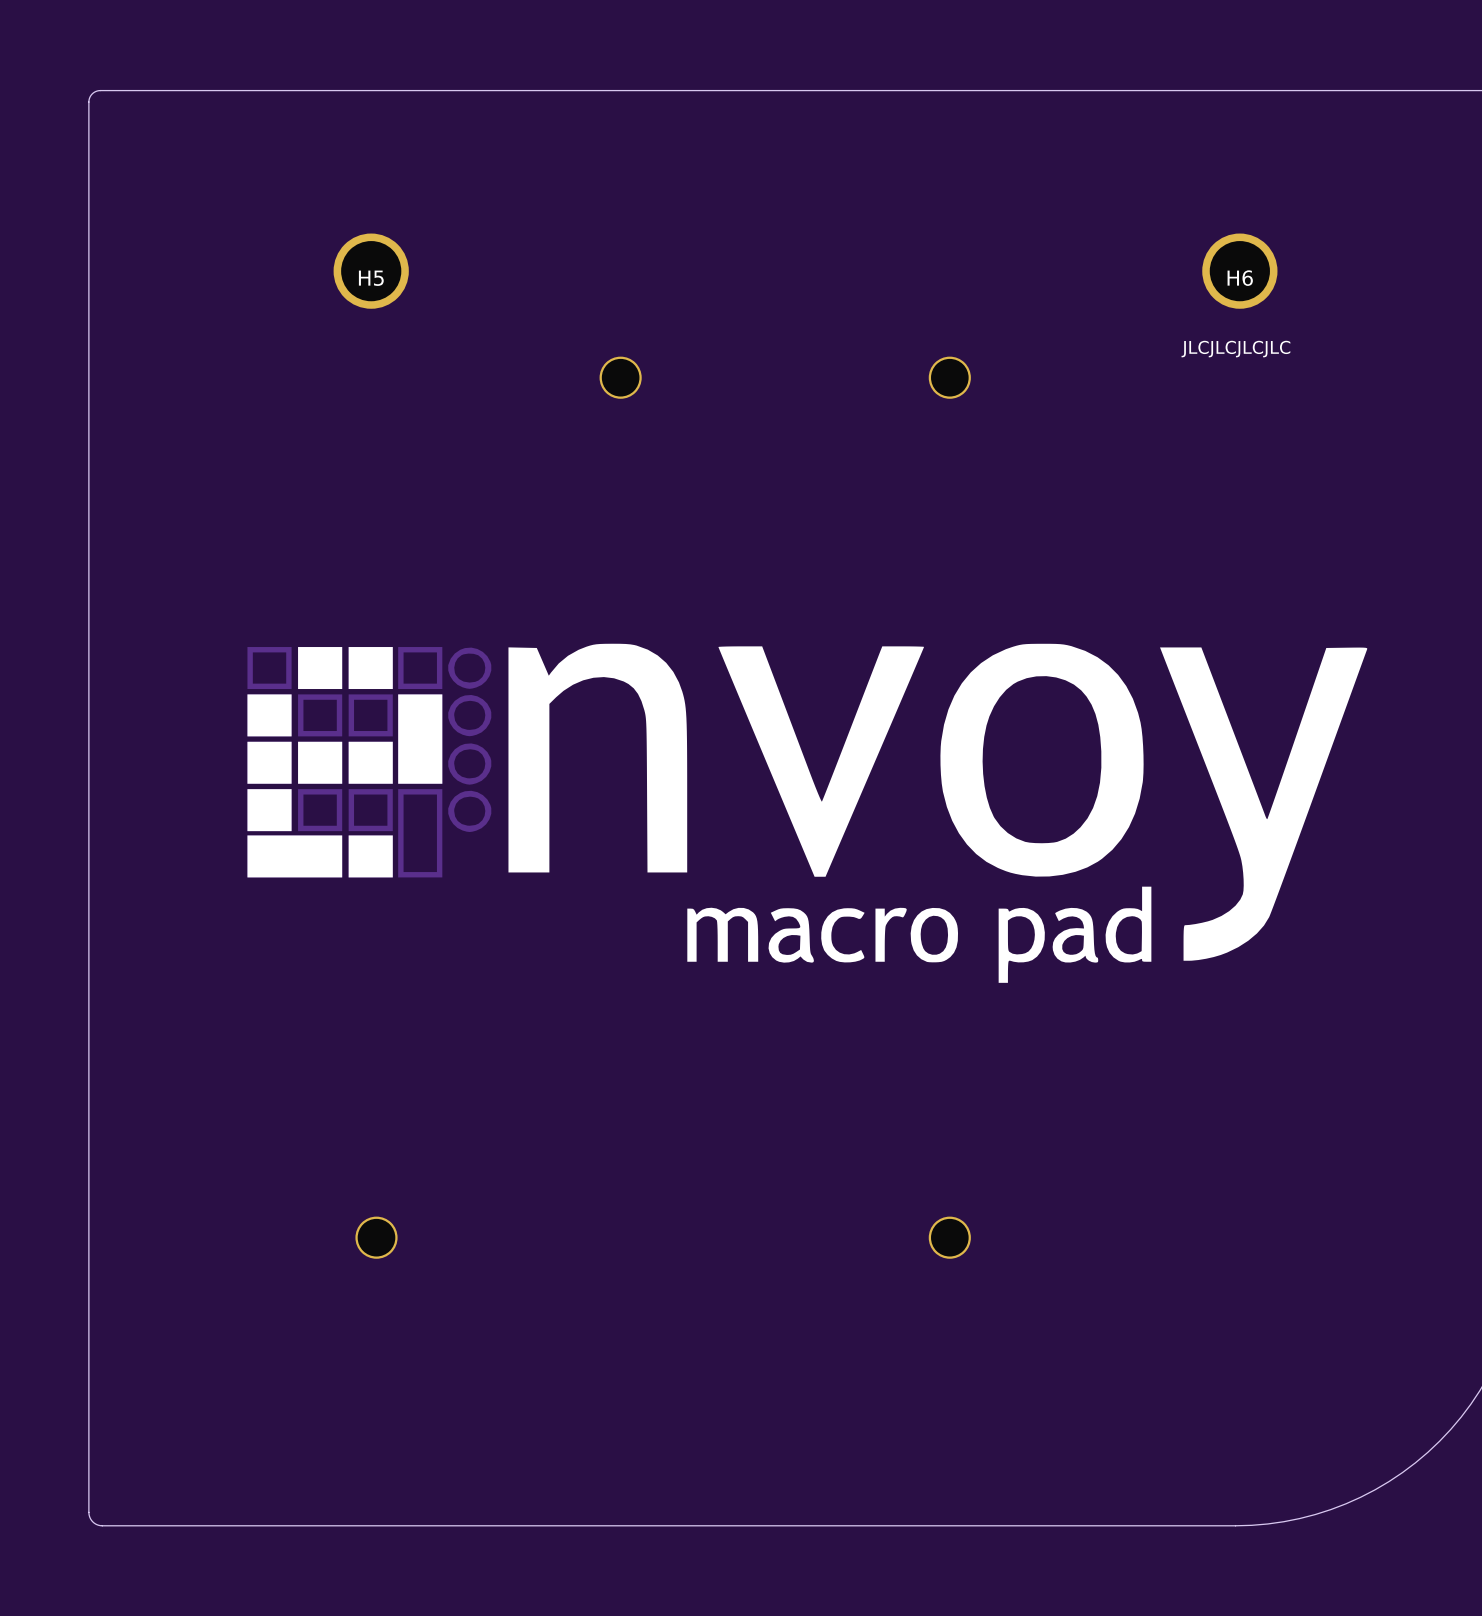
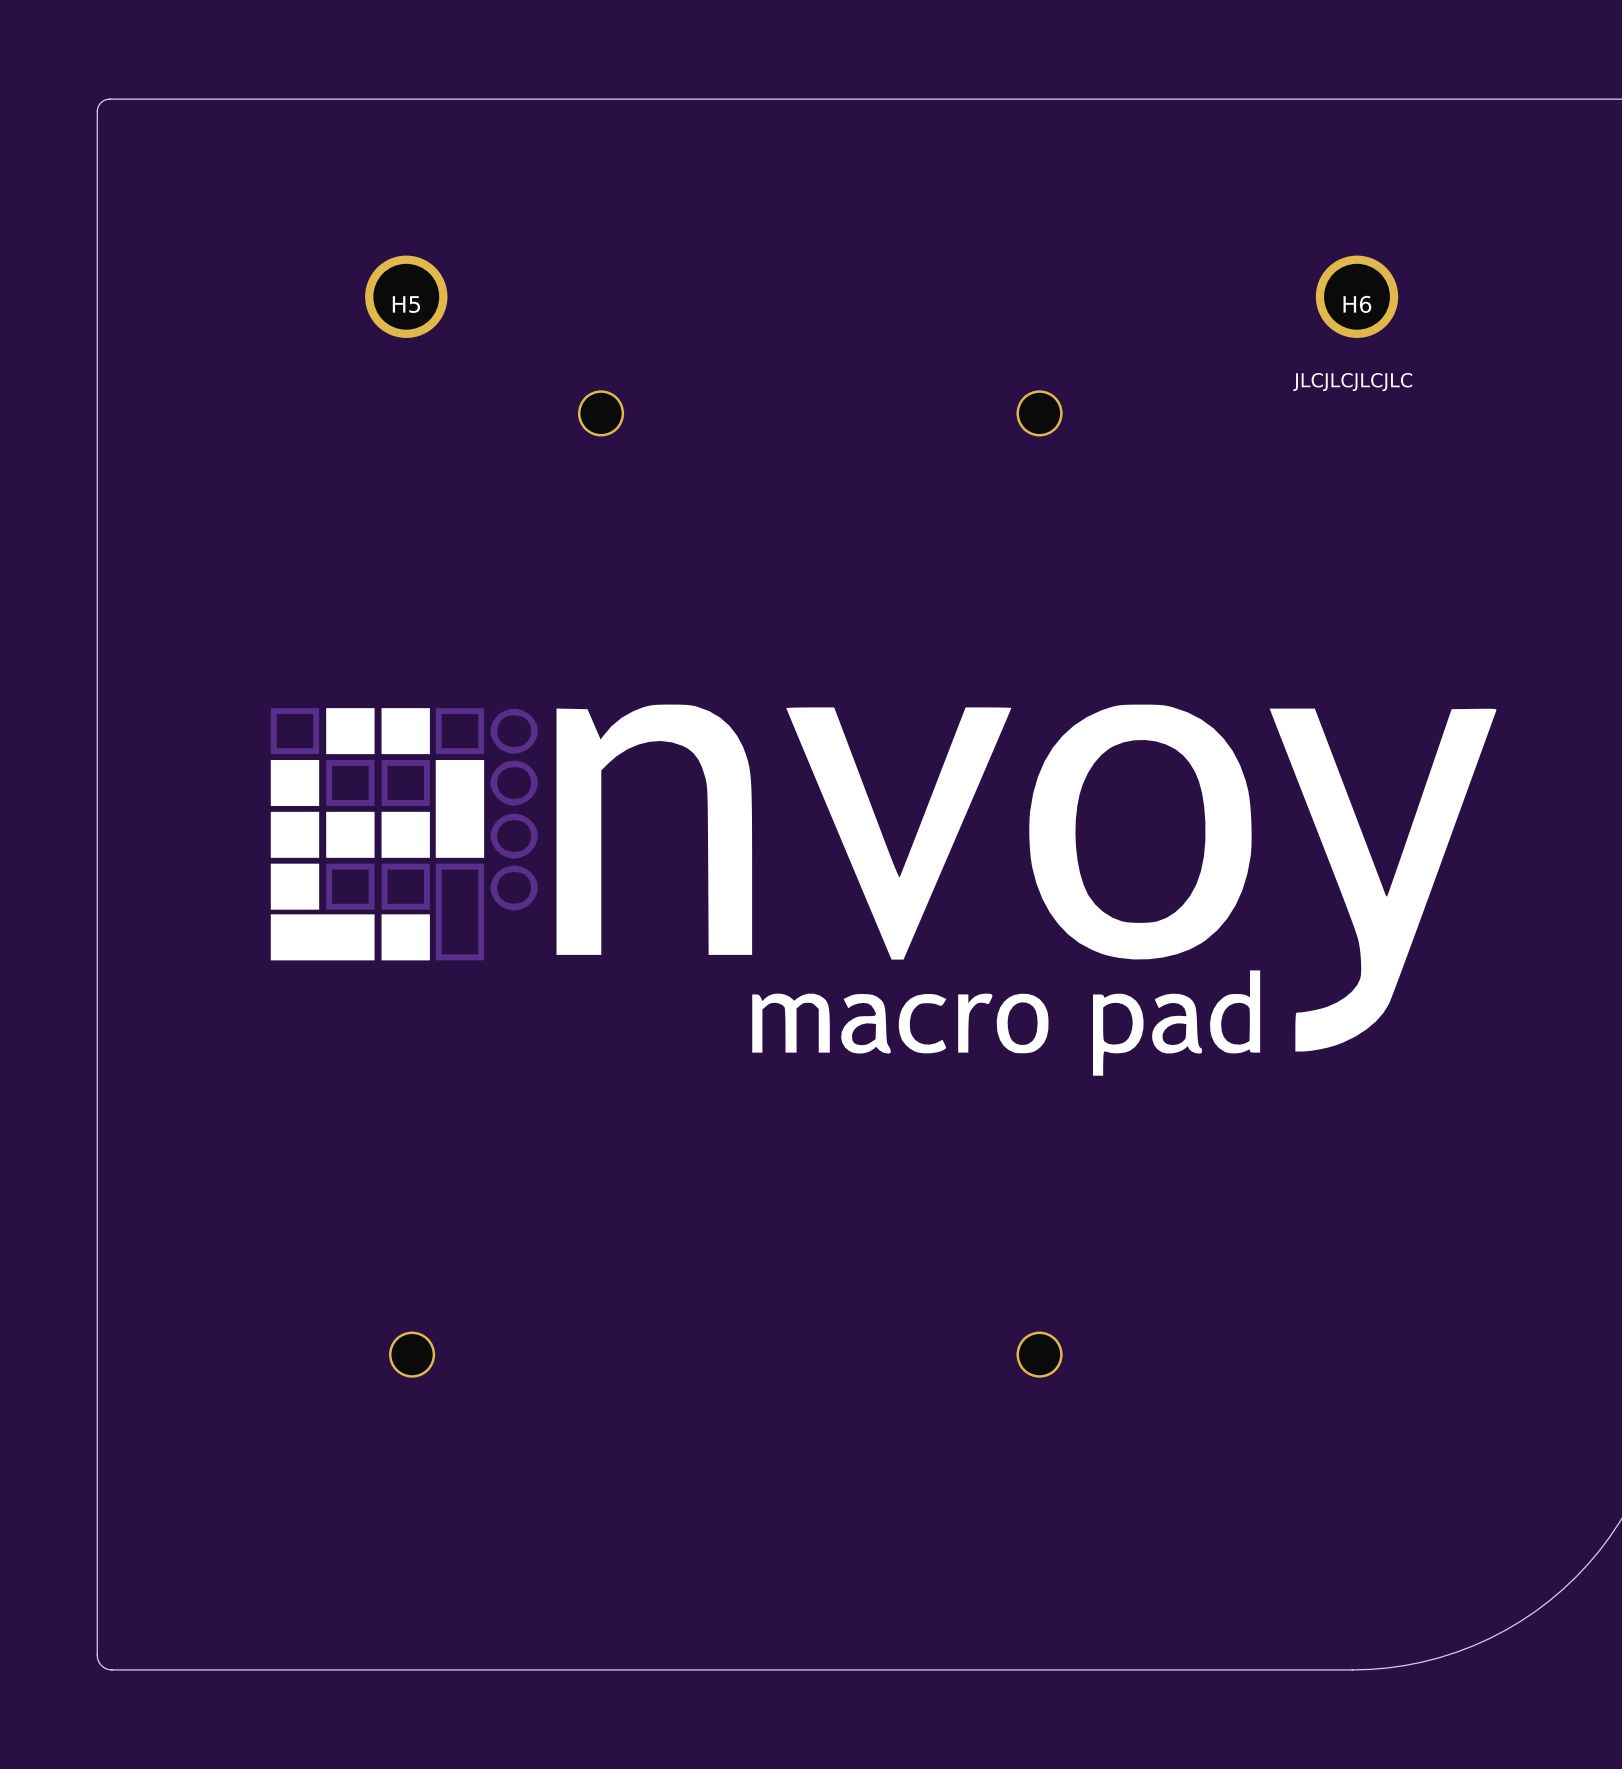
part position: (620, 377) -> (601, 413)

